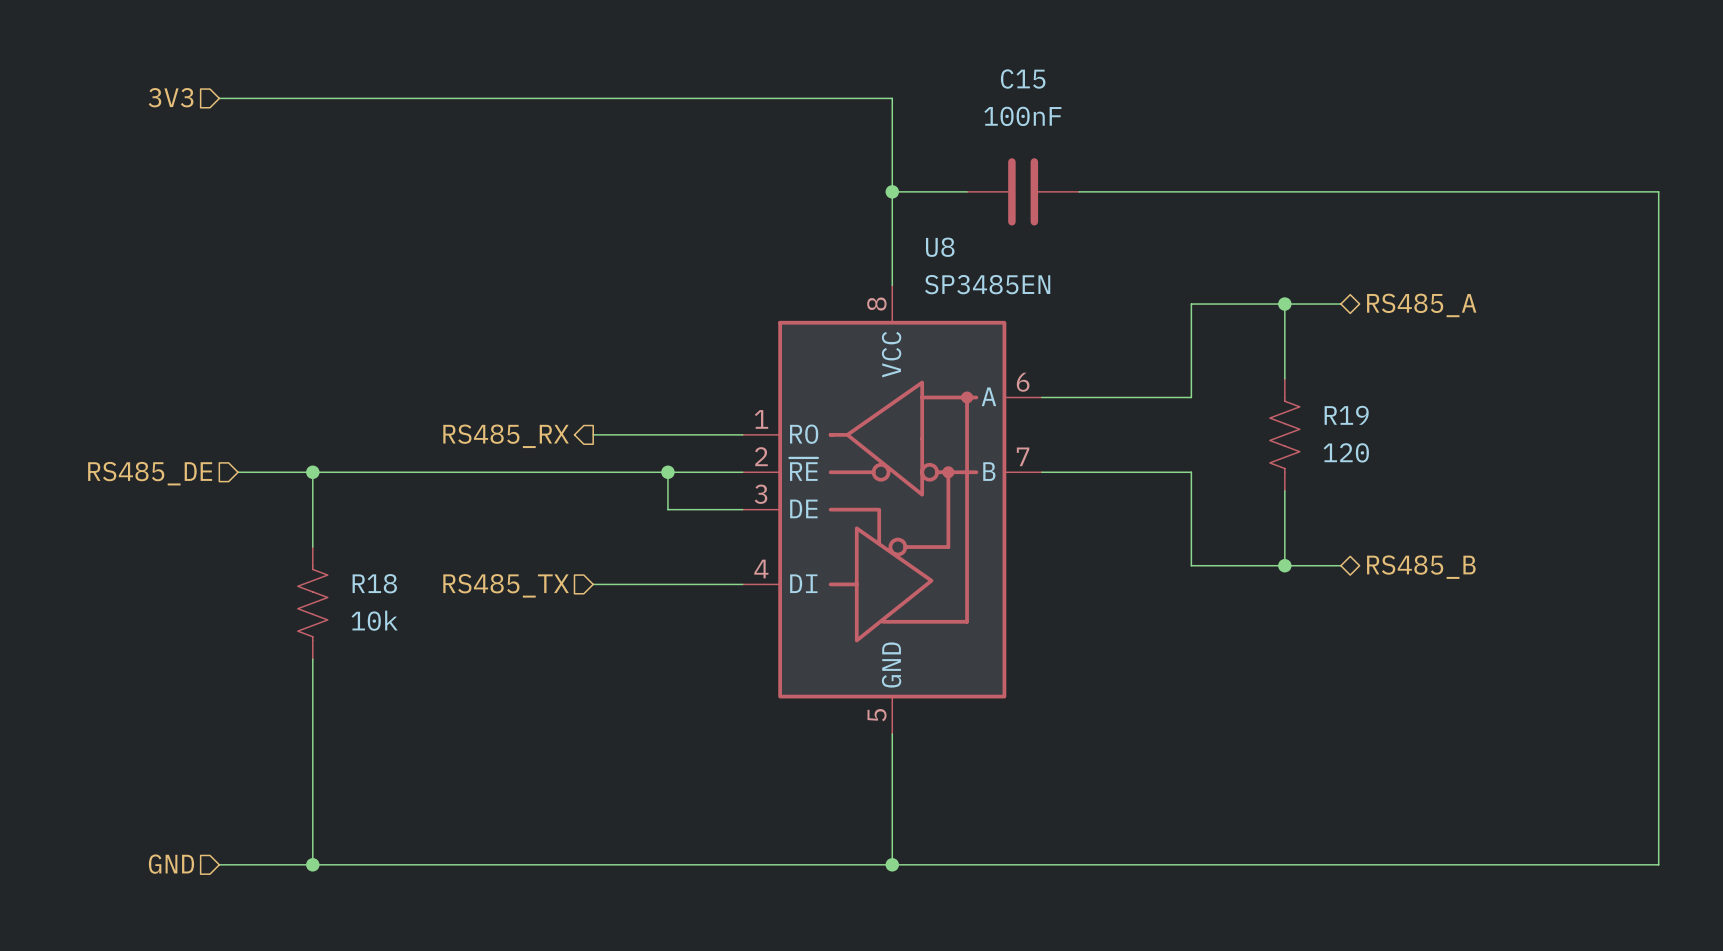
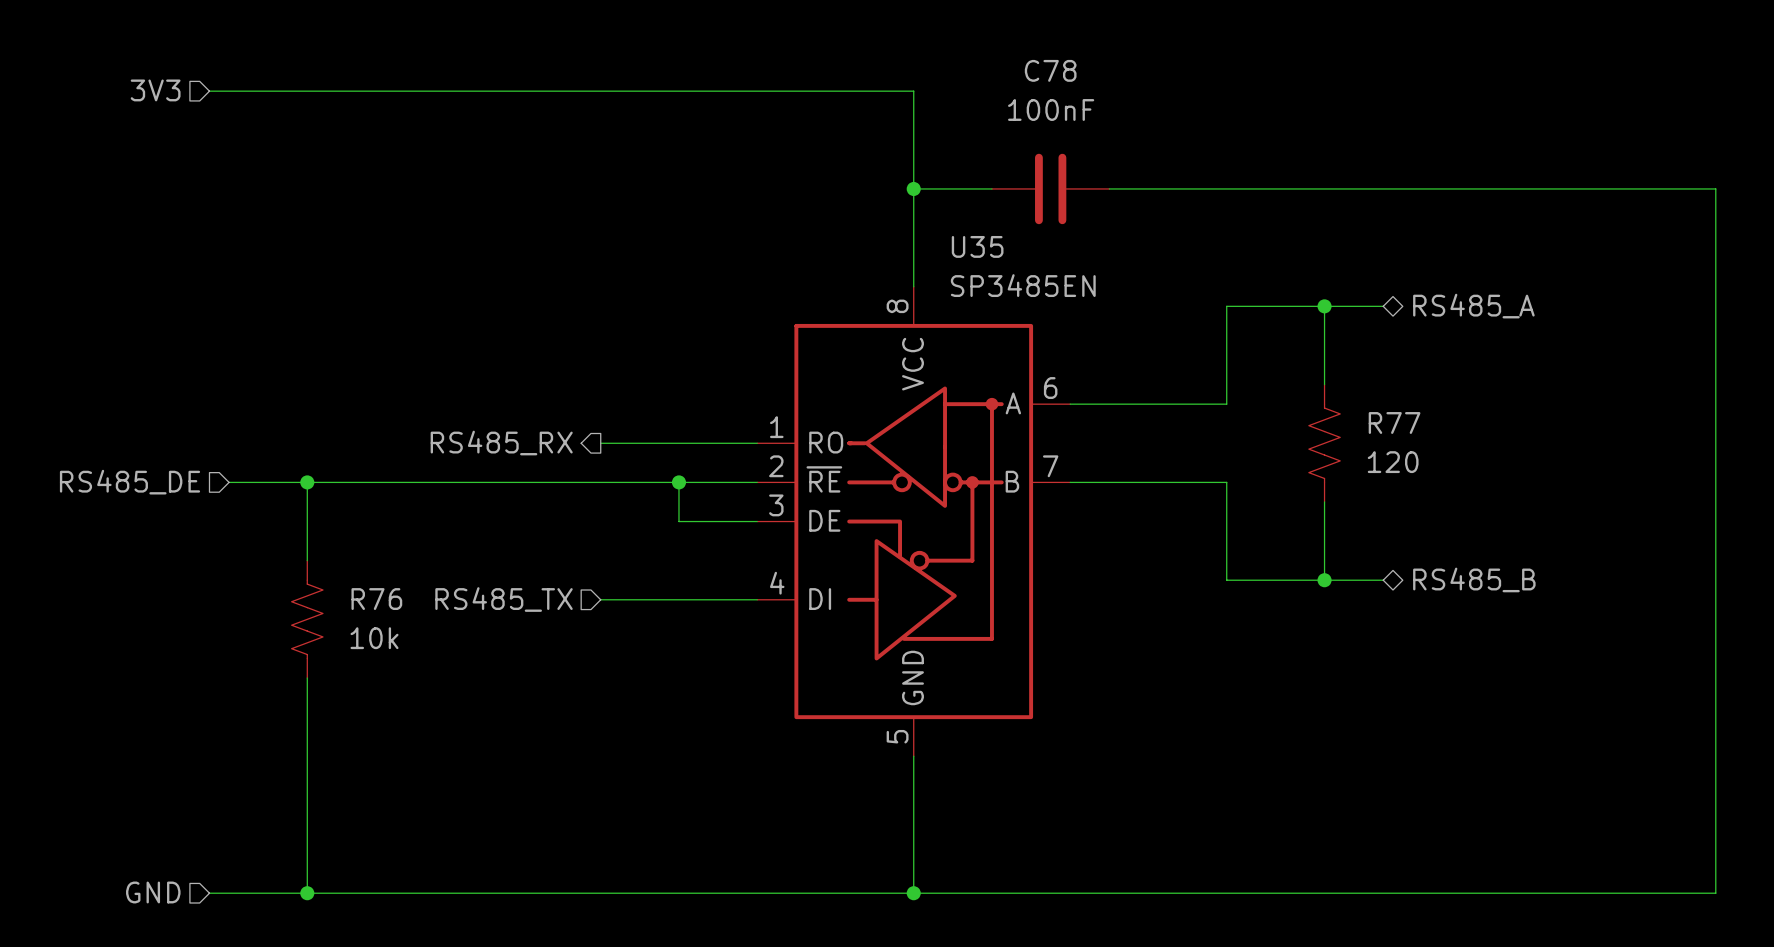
C15 name: C15 (1023, 79) -> C78 (1050, 70)
U8 name: U8 (940, 247) -> U35 (977, 246)
R19 name: R19 (1346, 415) -> R77 (1394, 422)
R18 name: R18 (374, 583) -> R76 (376, 599)

